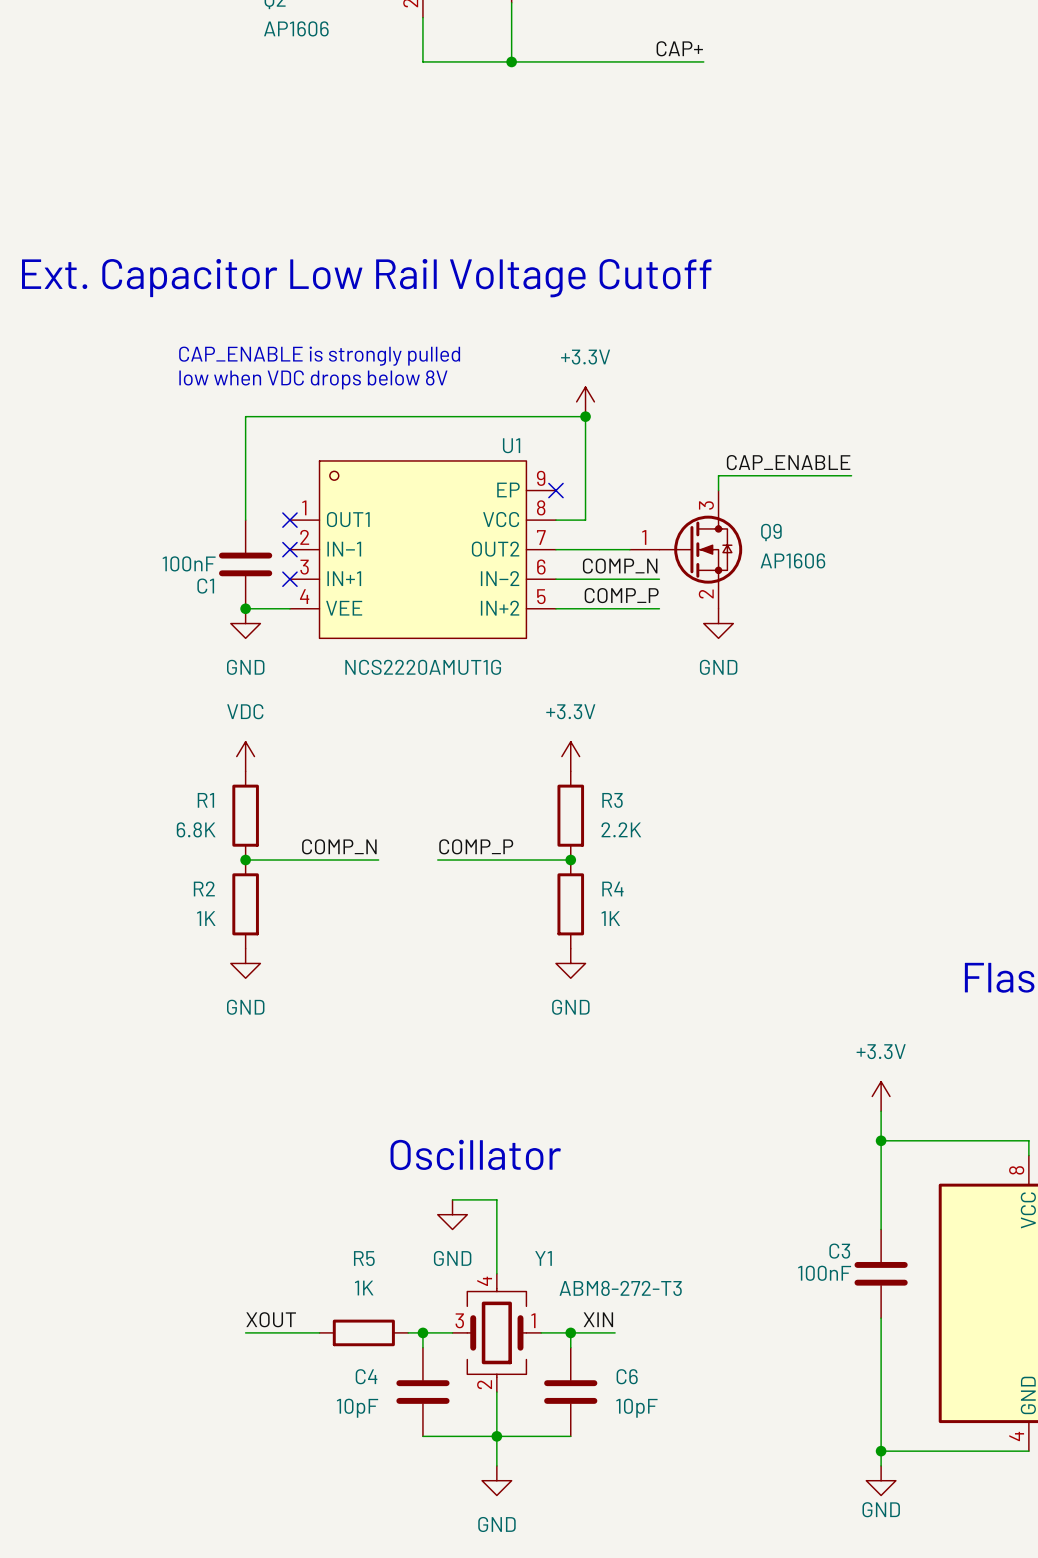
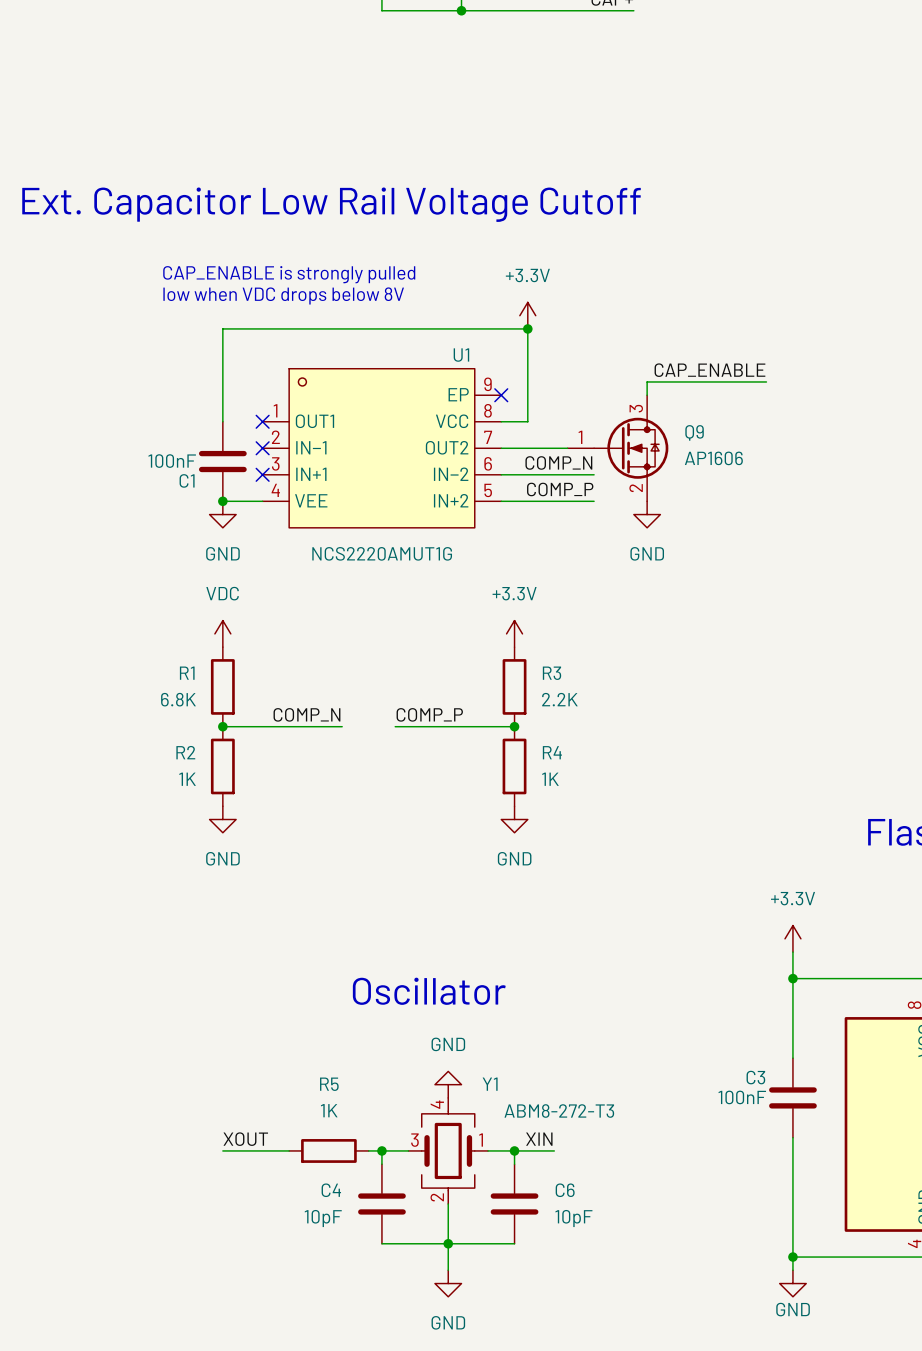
wire: (452, 1199) (496, 1199) (496, 1273) -> none
power symbol rotation: 0° (452, 1214) -> 180° (448, 1084)
power symbol position: GND (452, 1214) -> GND (448, 1084)

